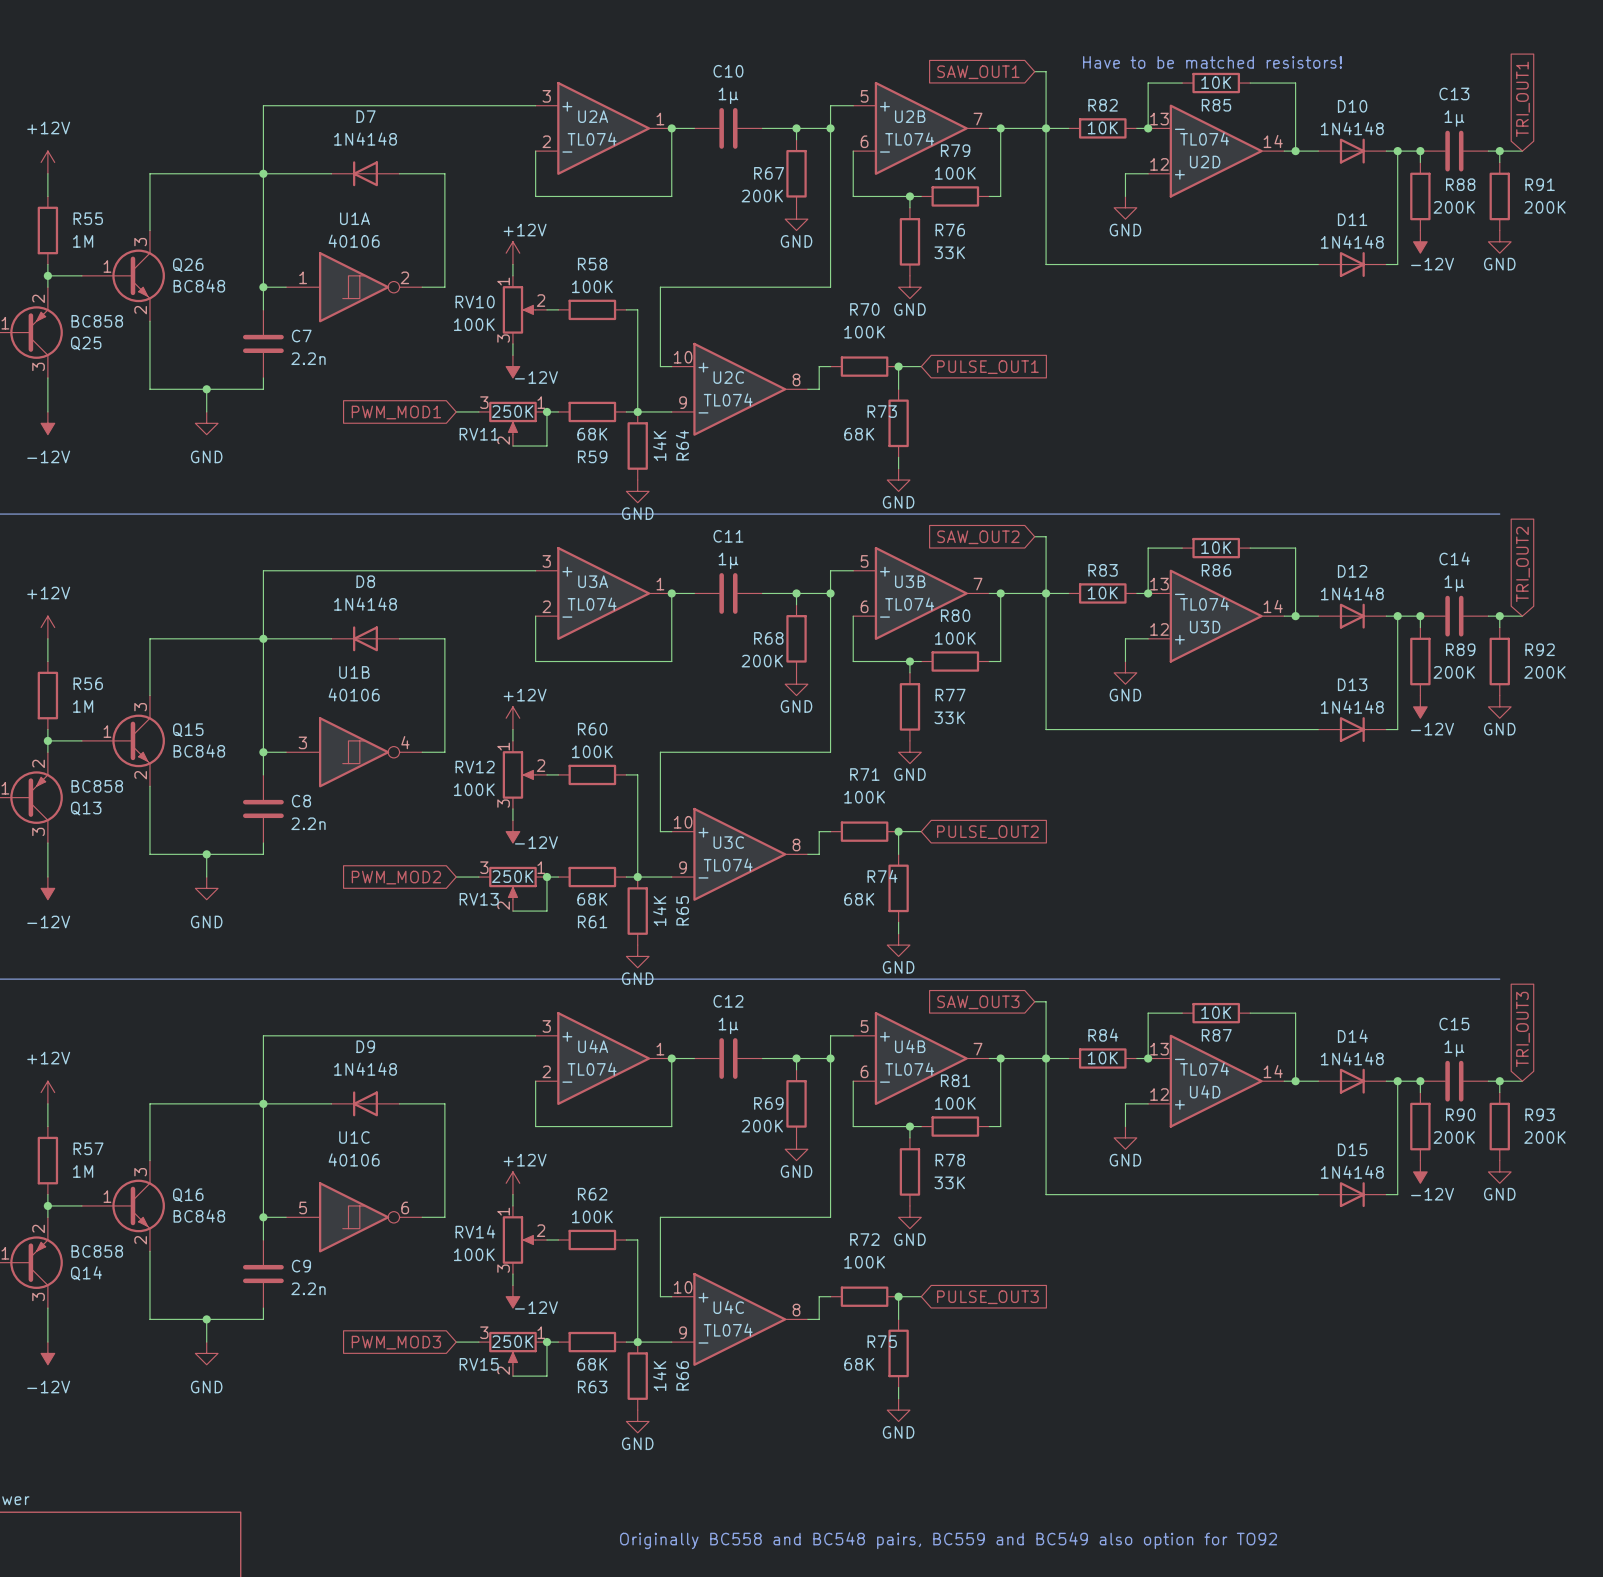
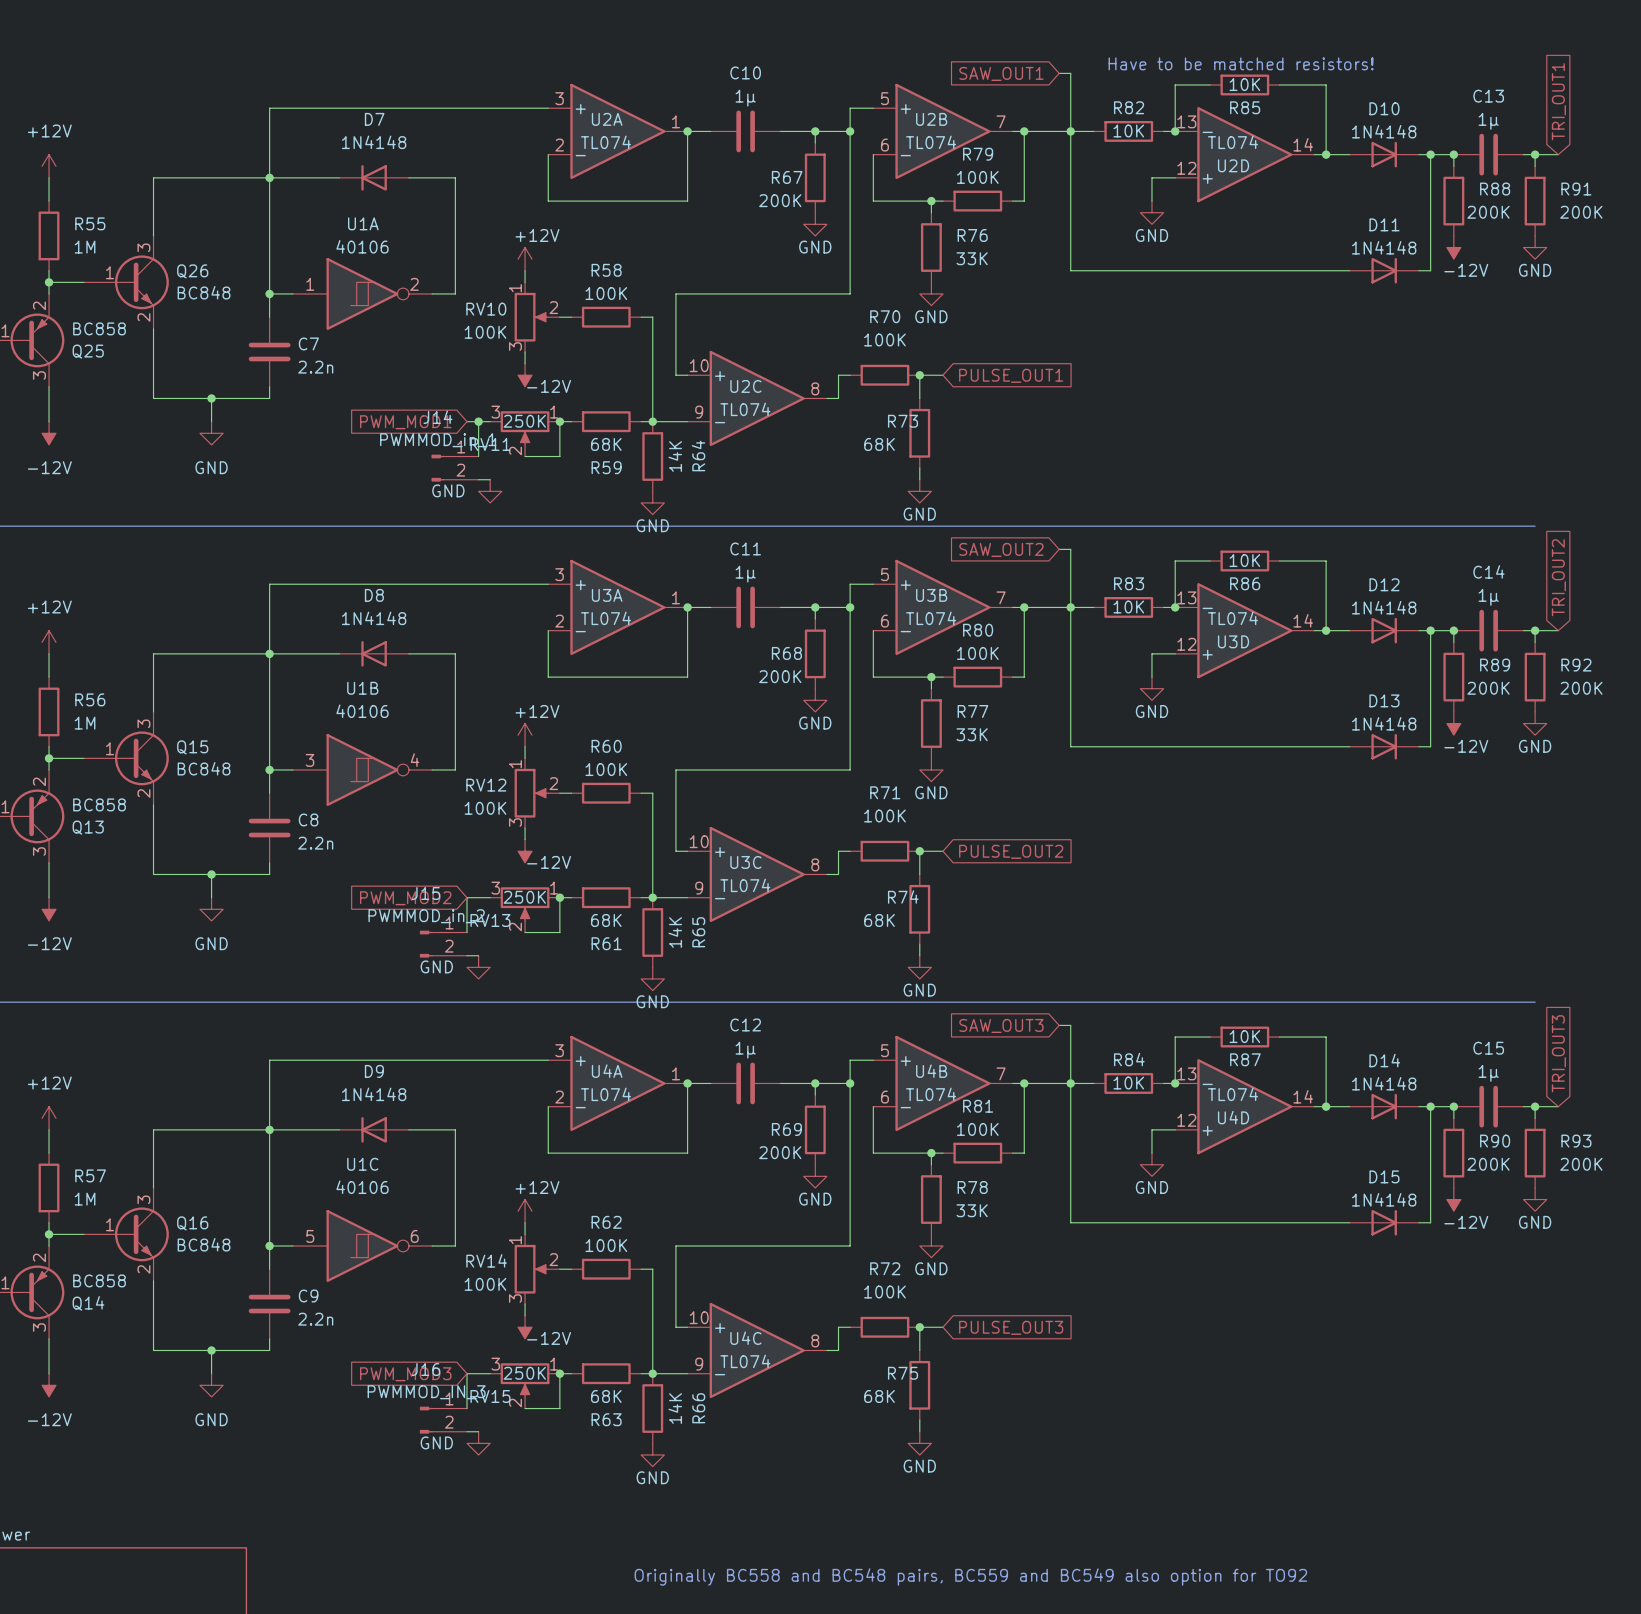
wire: none -> (478, 421) (478, 456)
junction: none -> (478, 421)
J14: none -> PWMMOD_in_1 (455, 468)
wire: none -> (478, 479) (490, 479)
power symbol: none -> GND (490, 491)
wire: none -> (466, 897) (466, 932)
J15: none -> PWMMOD_in_2 (443, 944)
wire: none -> (466, 955) (478, 955)
power symbol: none -> GND (478, 967)
wire: none -> (466, 1373) (466, 1408)
J16: none -> PWMMOD_IN_3 (443, 1420)
wire: none -> (466, 1431) (478, 1431)
power symbol: none -> GND (478, 1443)

